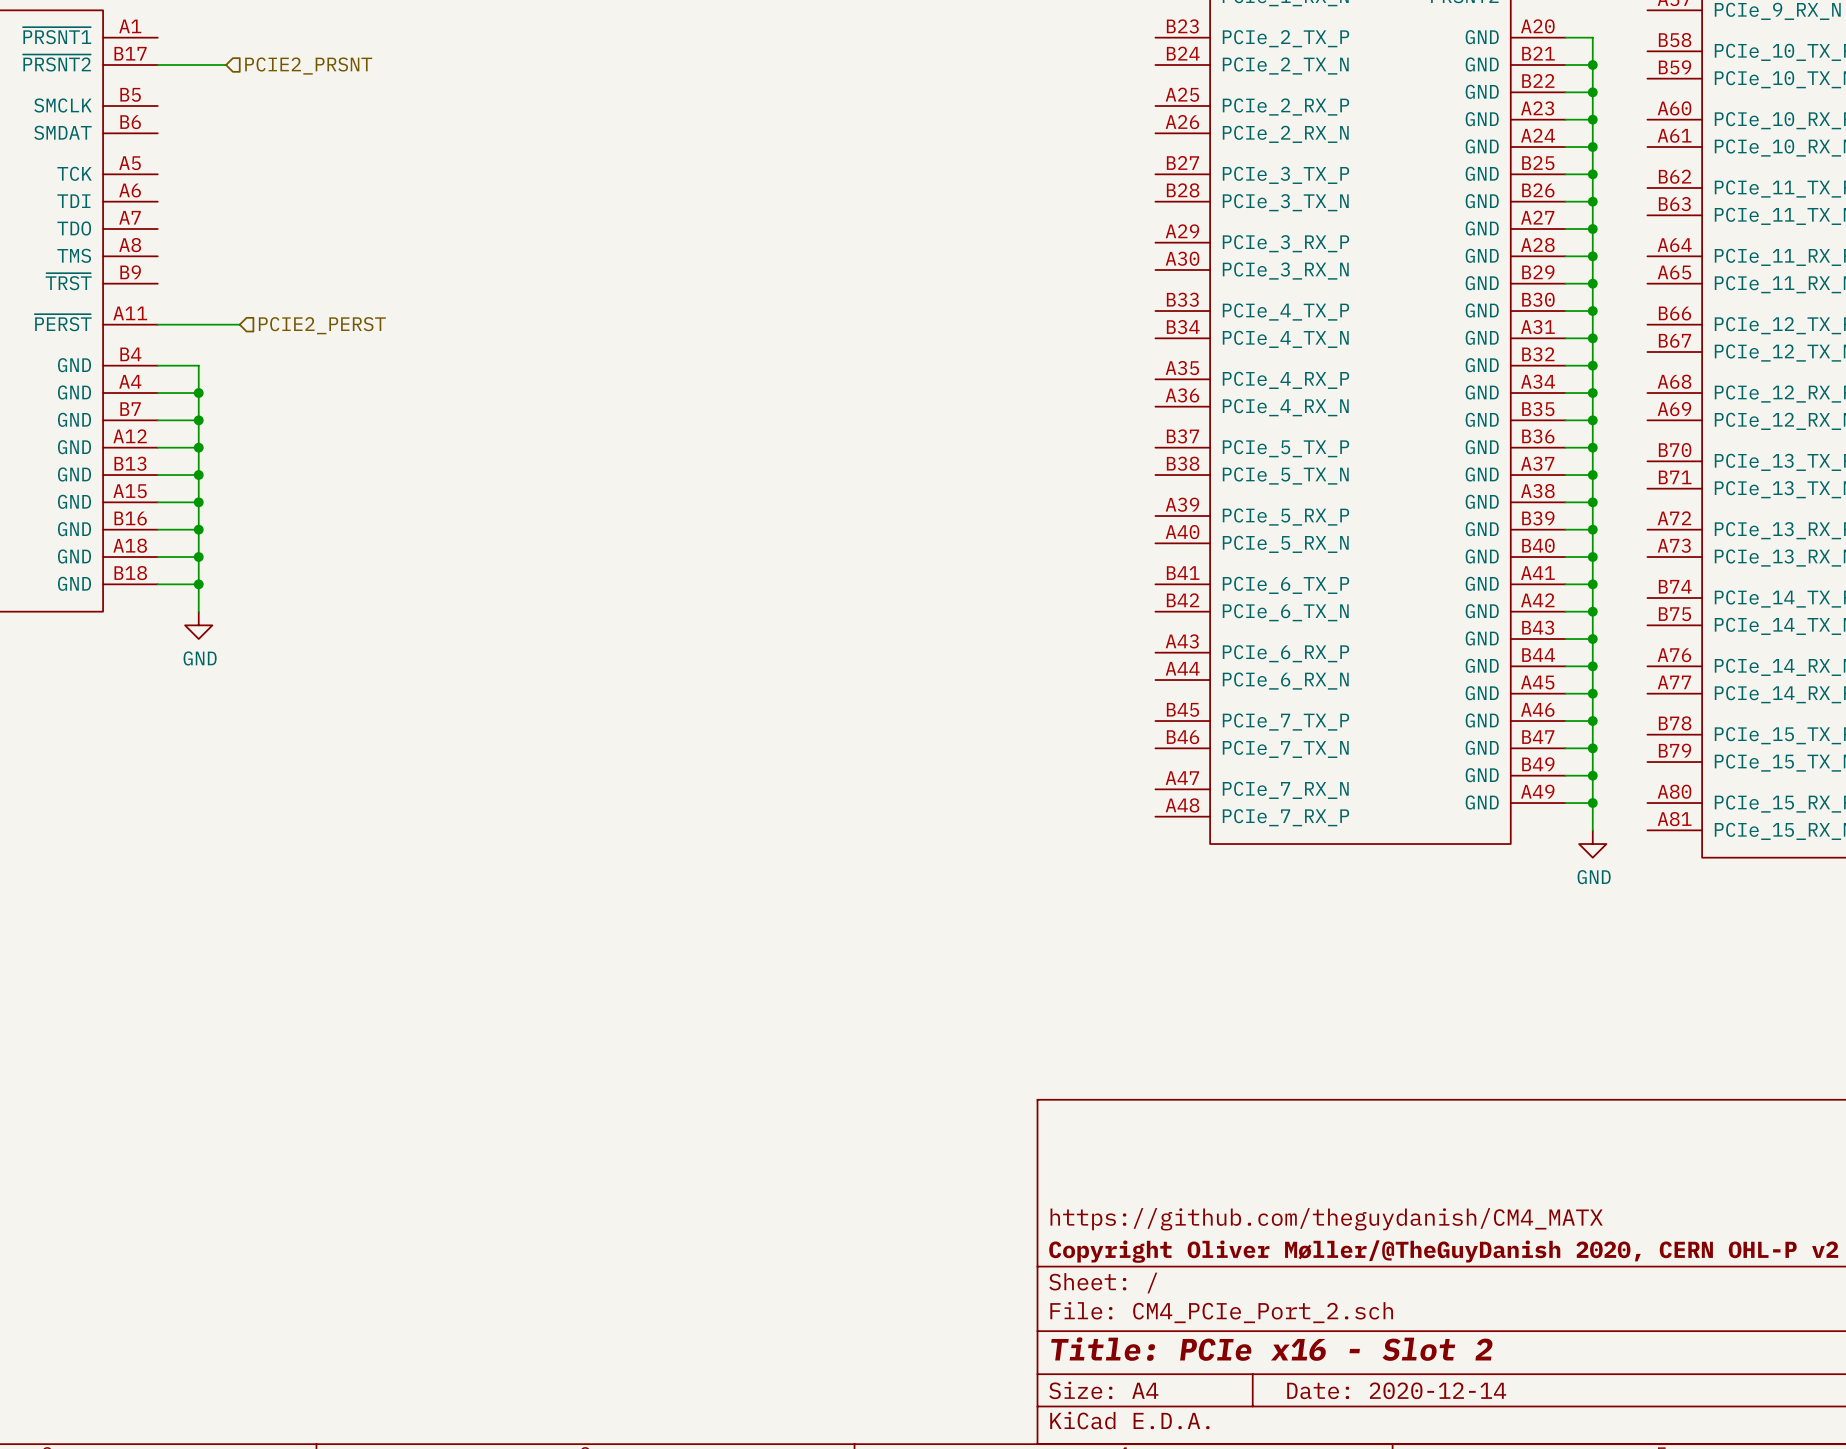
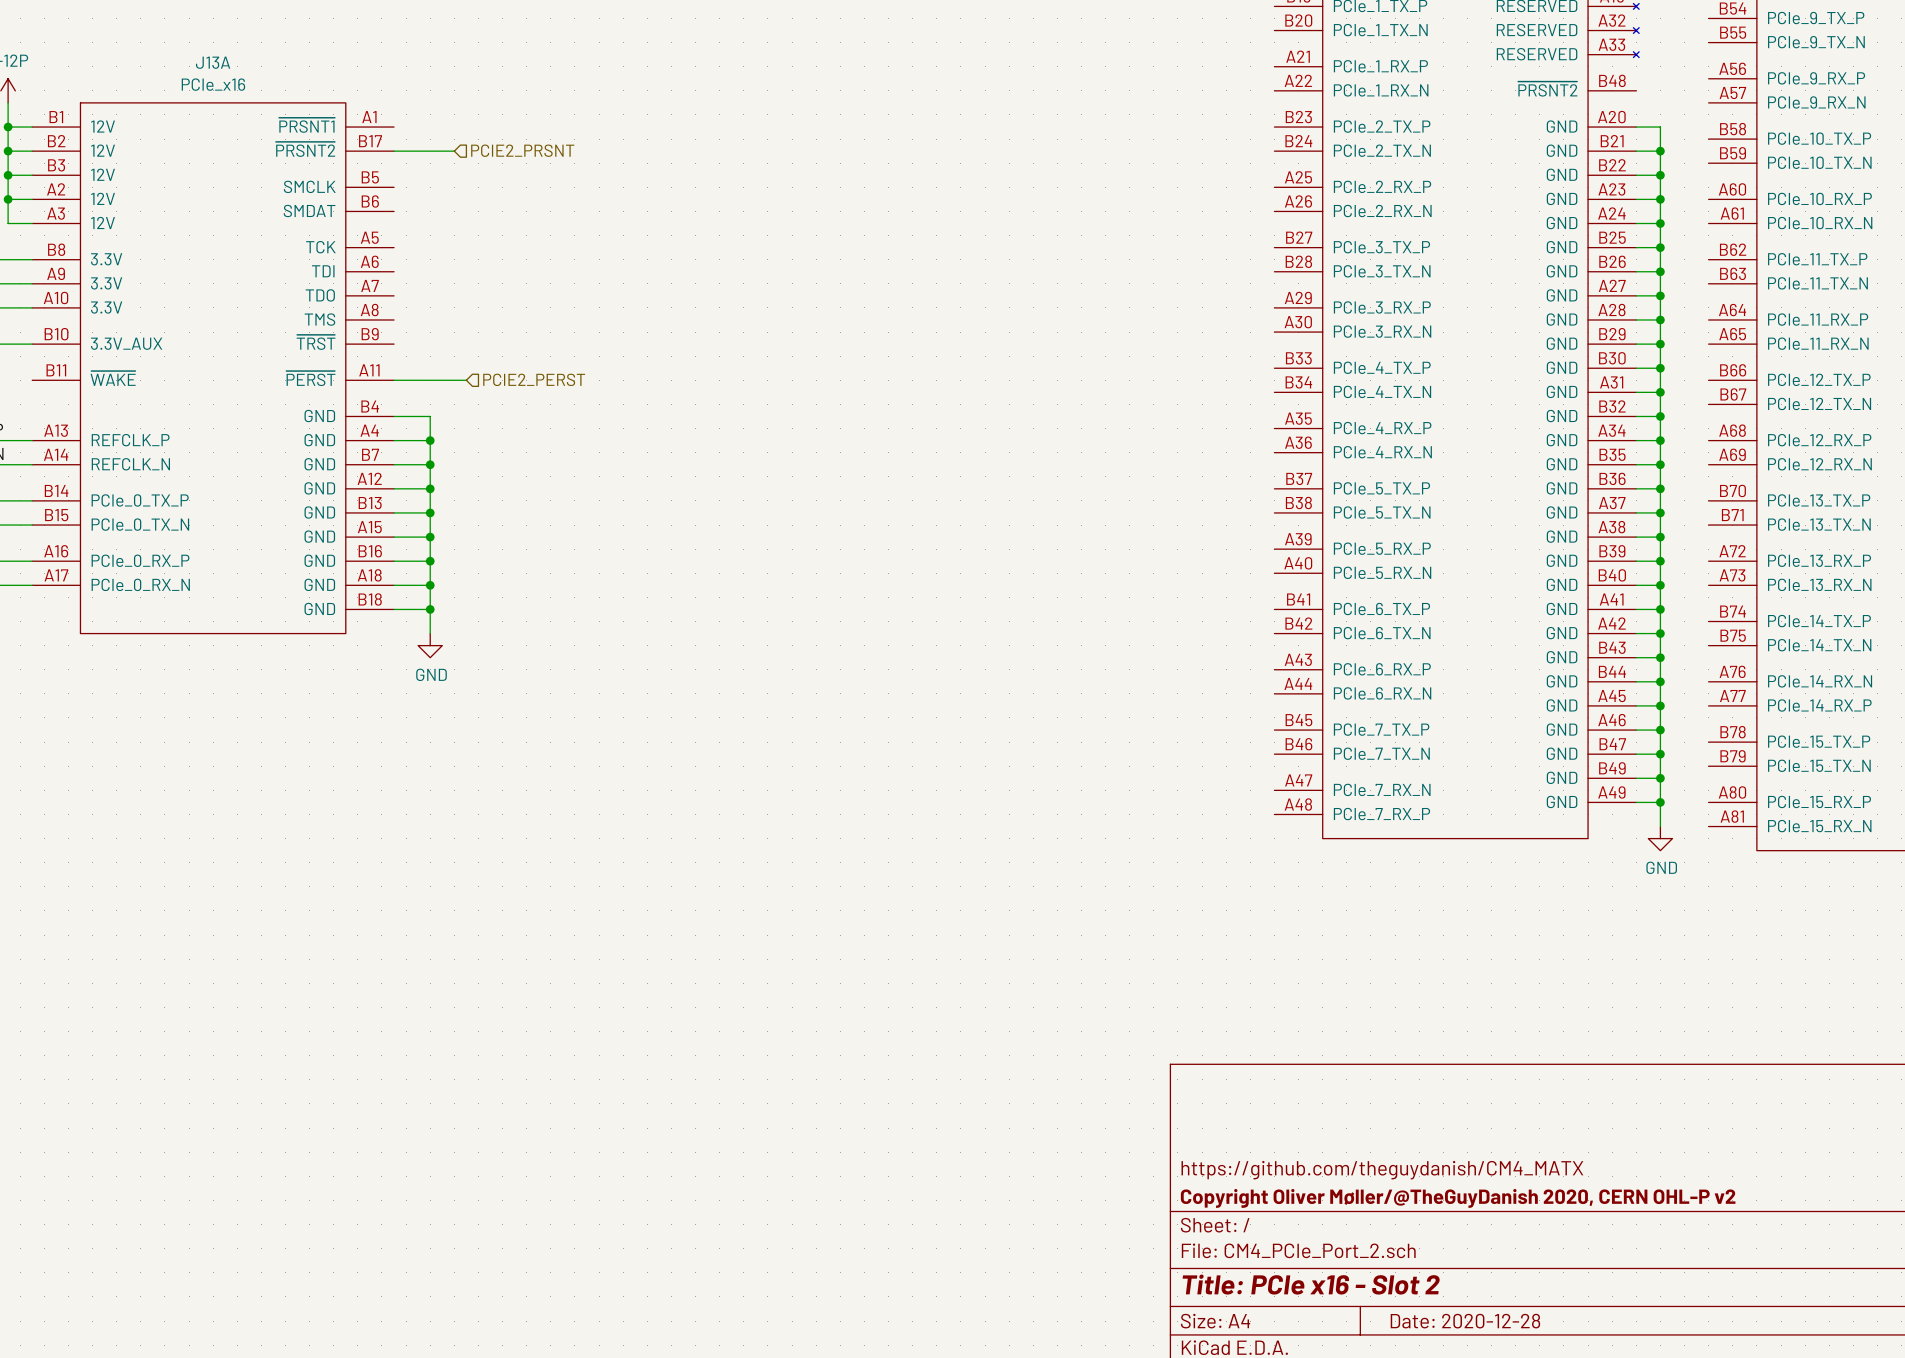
title block: Date: 2020-12-14 (1396, 1390) -> Date: 2020-12-28 (1465, 1321)

